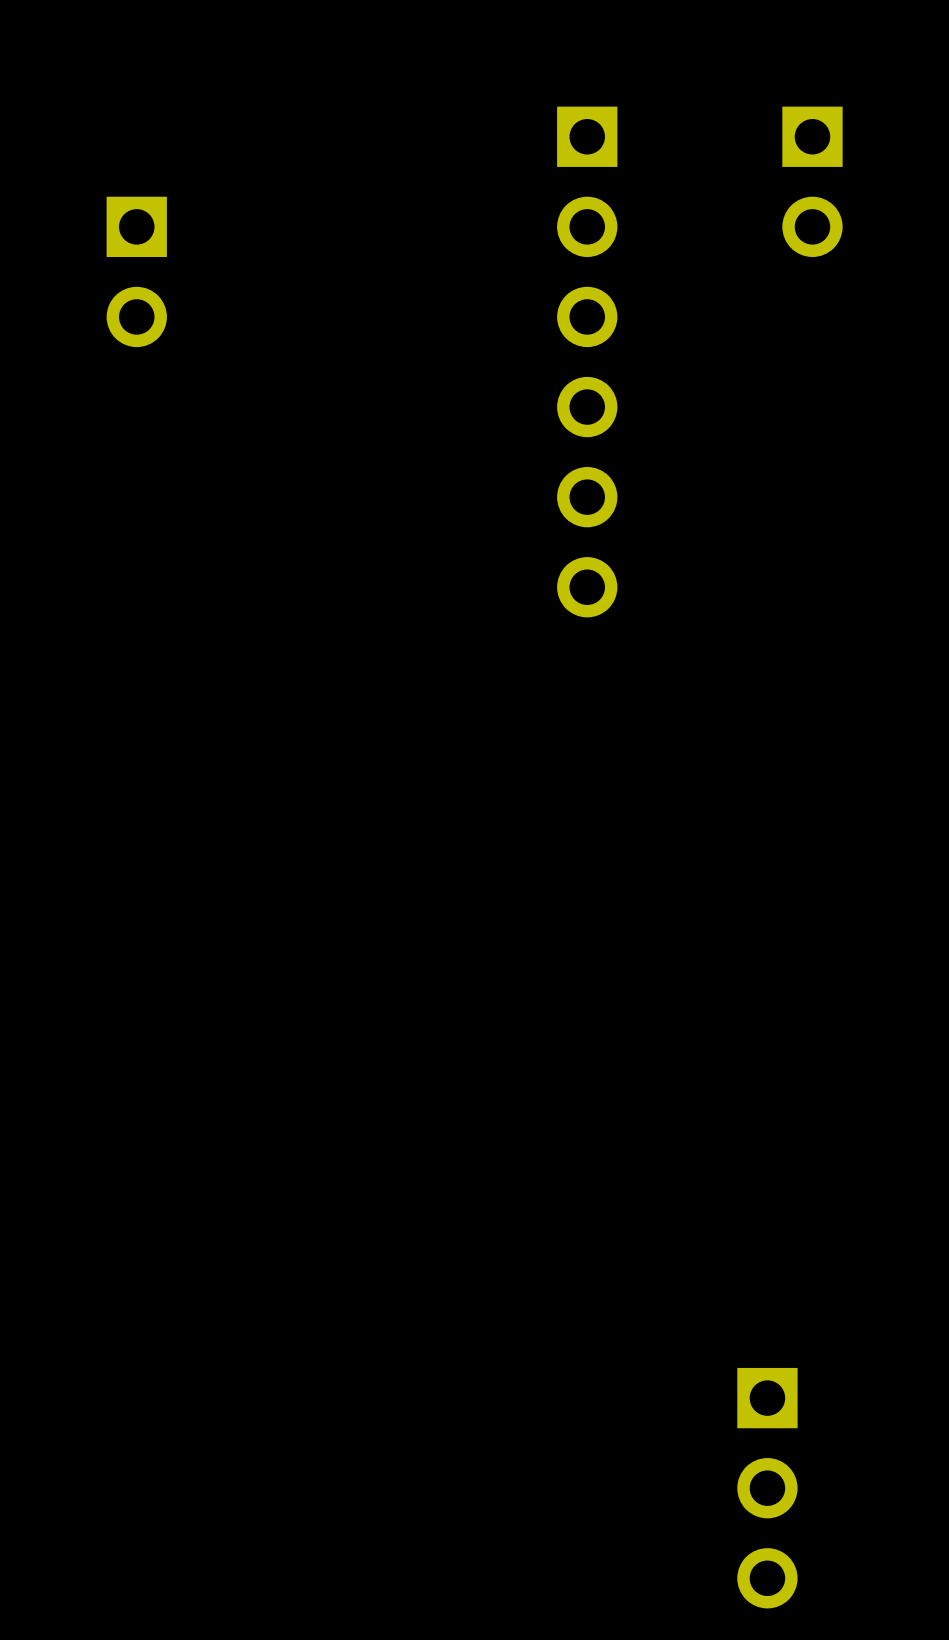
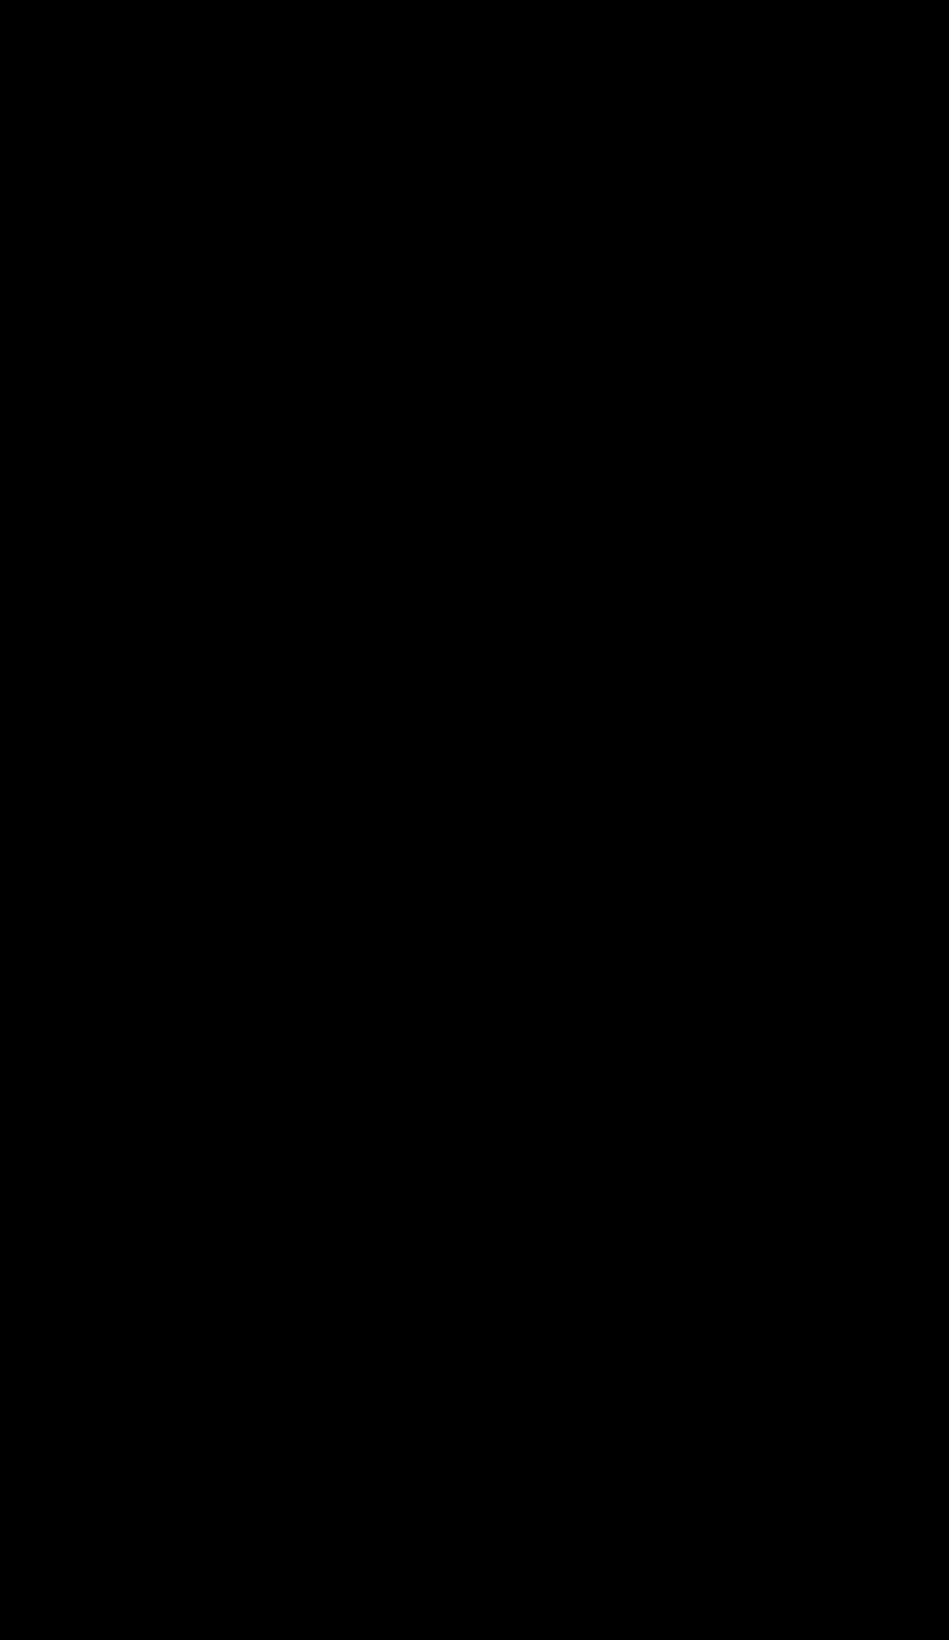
part: (812, 181) -> none
part: (136, 271) -> none
part: (587, 362) -> none
part: (767, 1488) -> none

